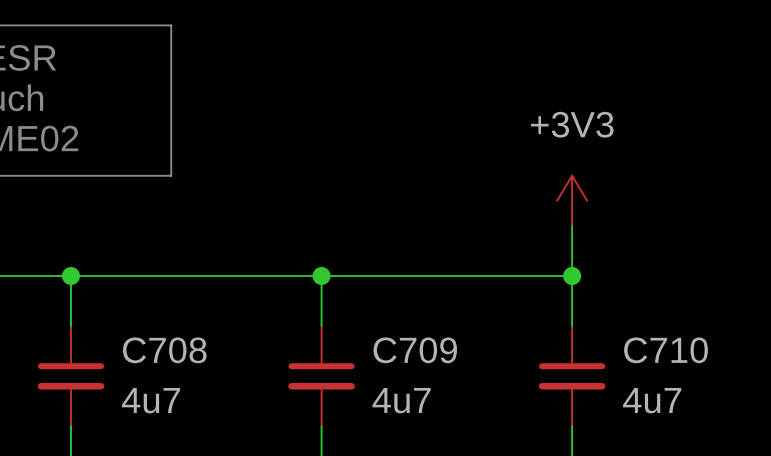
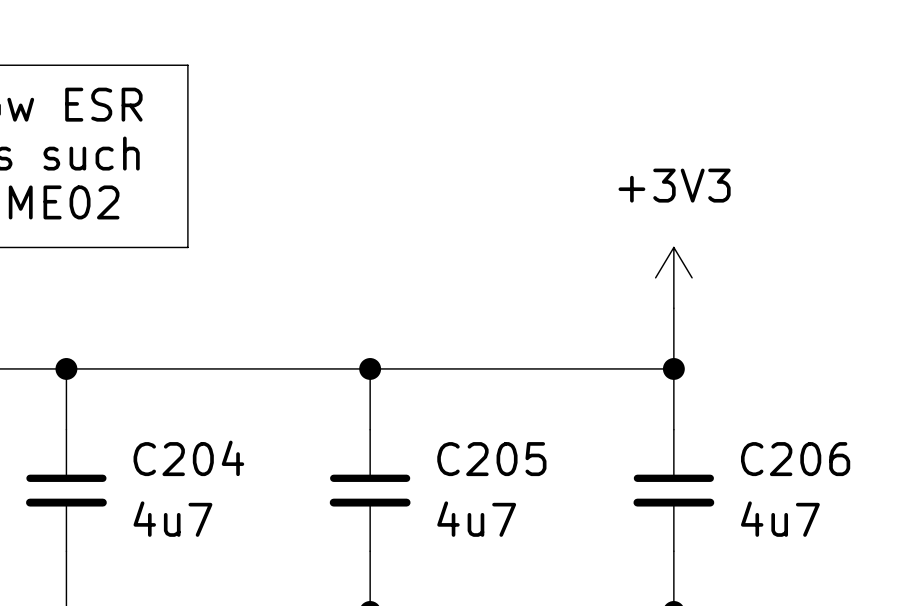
C708 name: C708 (164, 350) -> C204 (188, 458)
C709 name: C709 (415, 350) -> C205 (491, 459)
C710 name: C710 (666, 350) -> C206 (795, 459)

